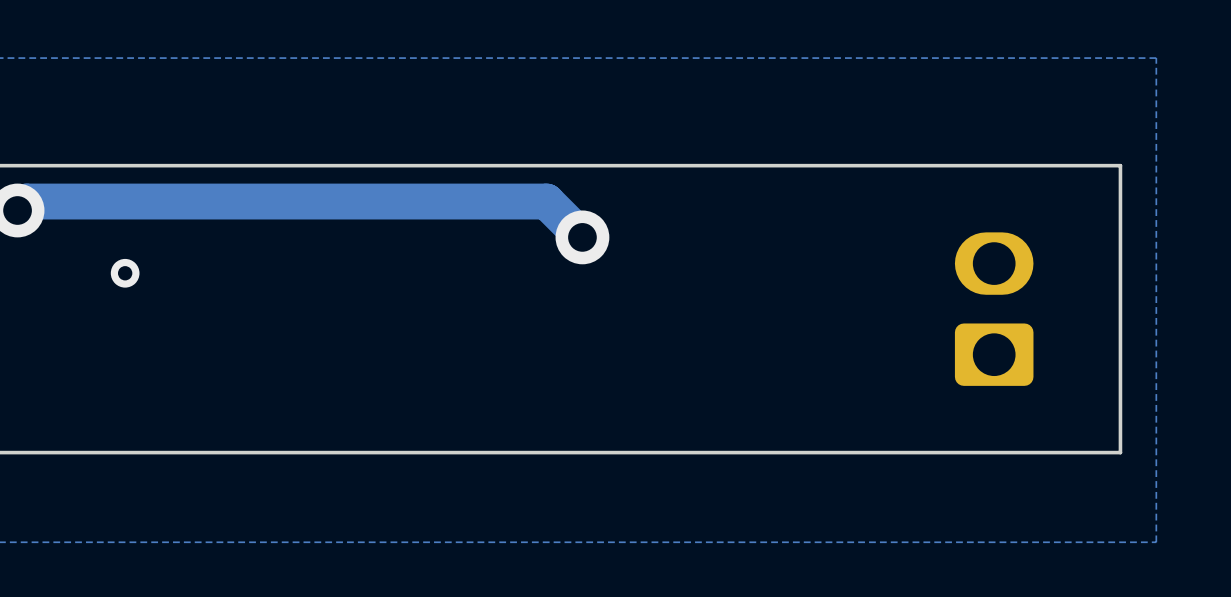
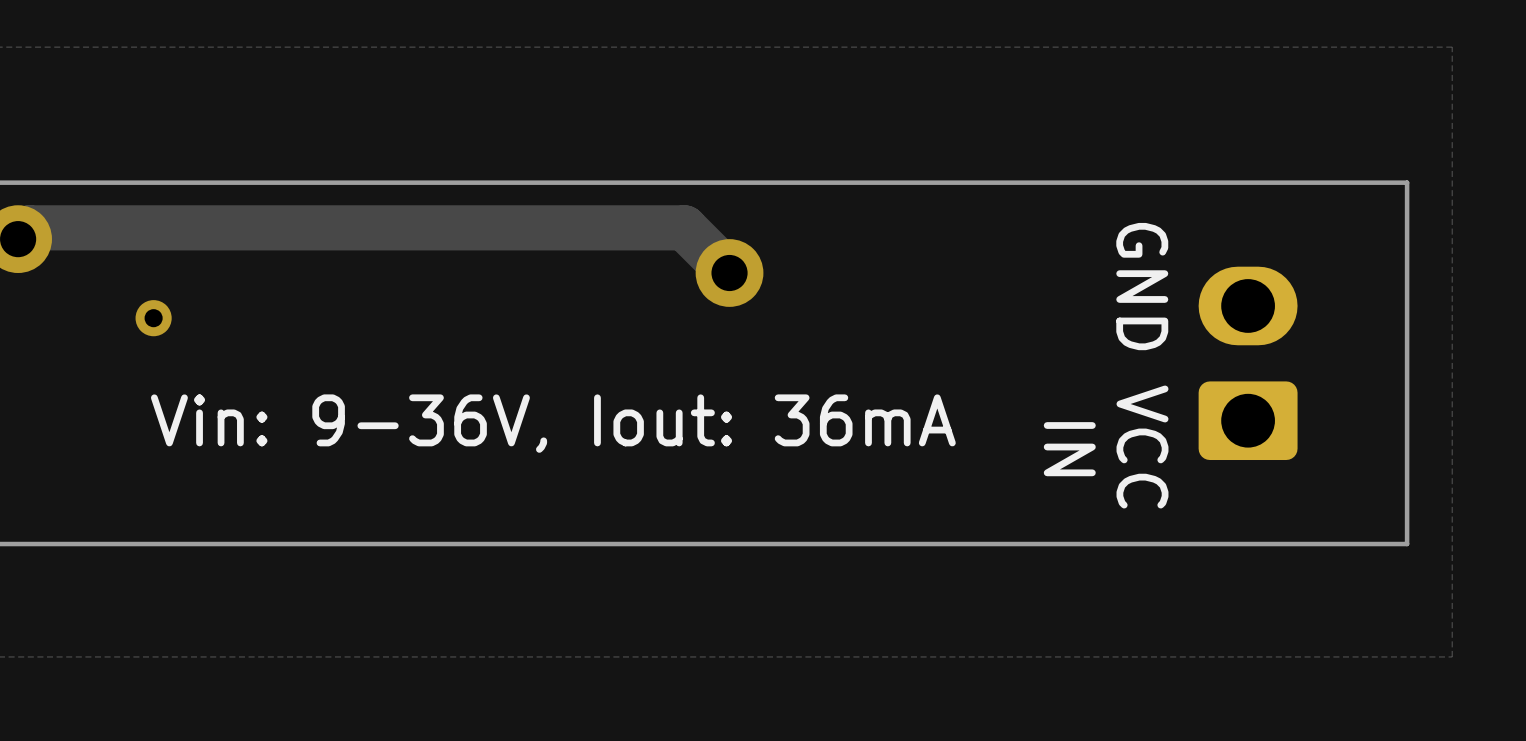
text: none -> GND (1142, 286)
text: none -> Vin: 9-36V, Iout: 36mA (553, 423)
text: none -> VCC (1142, 447)
text: none -> IN (1069, 449)

